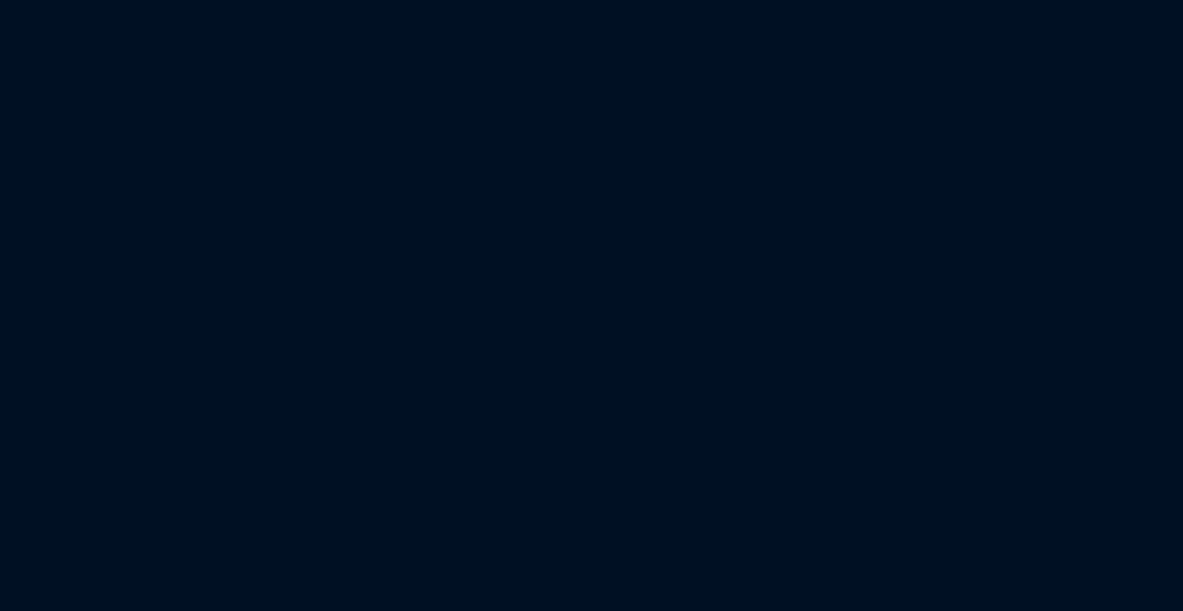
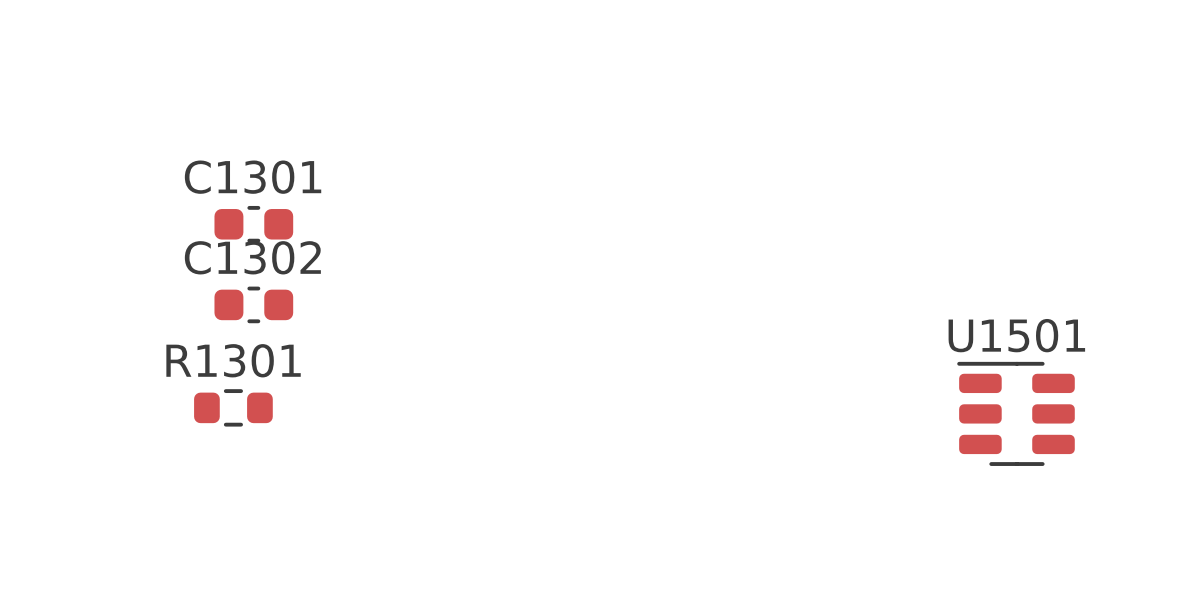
C1301: none -> (253, 224)
C1302: none -> (253, 304)
R1301: none -> (233, 407)
U1501: none -> (1016, 413)

